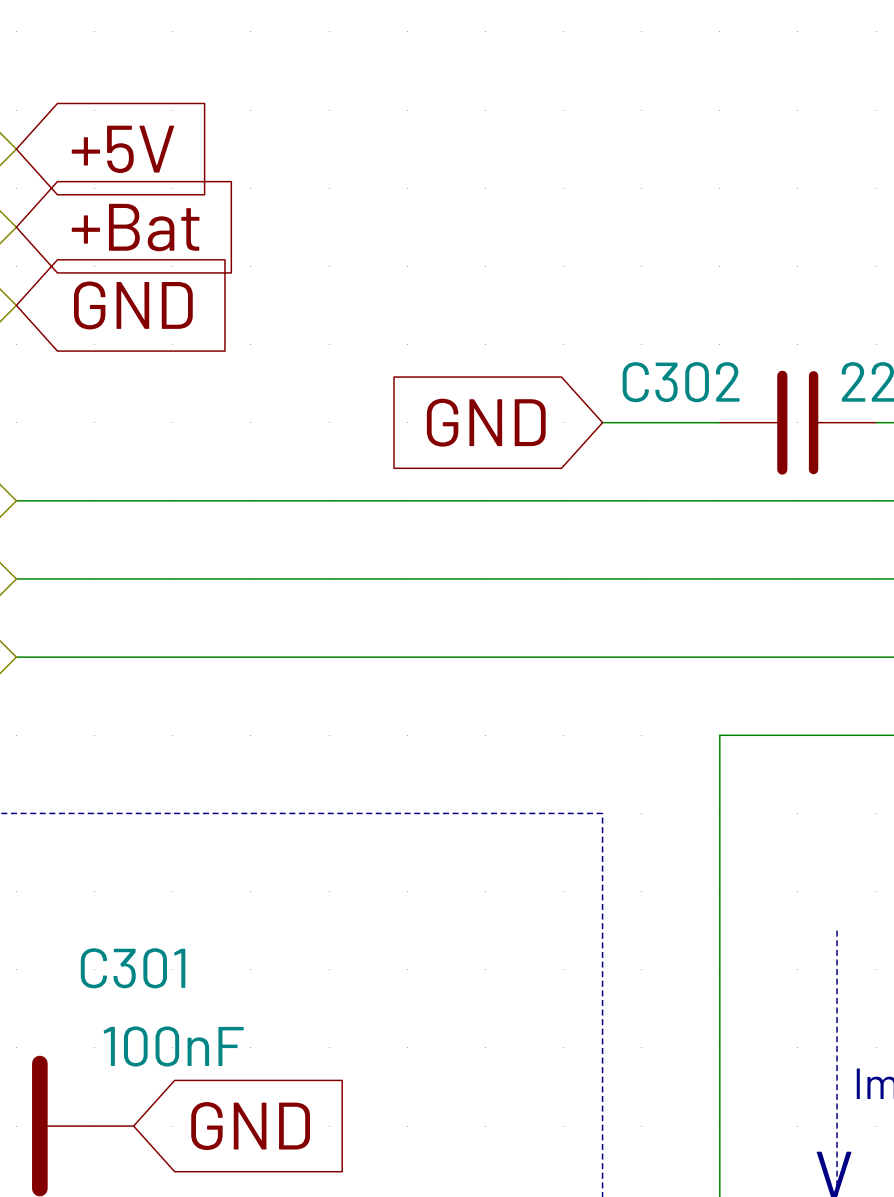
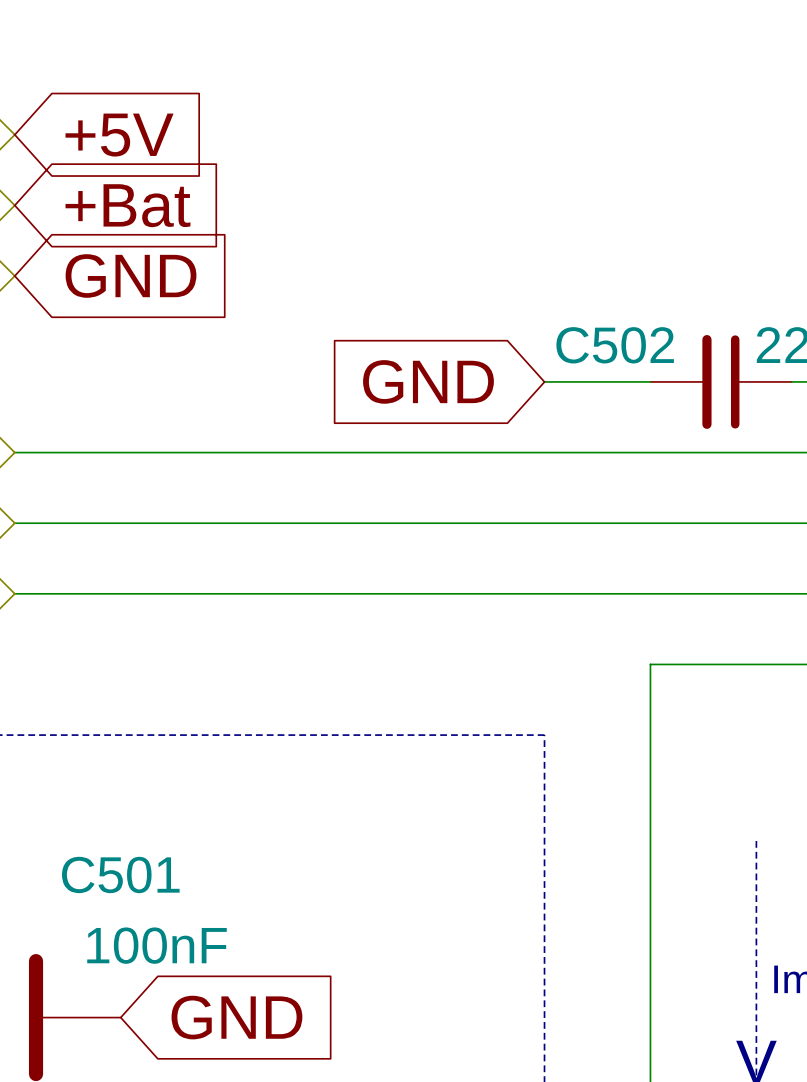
C302 name: C302 (681, 382) -> C502 (615, 345)
C301 name: C301 (133, 968) -> C501 (120, 874)

